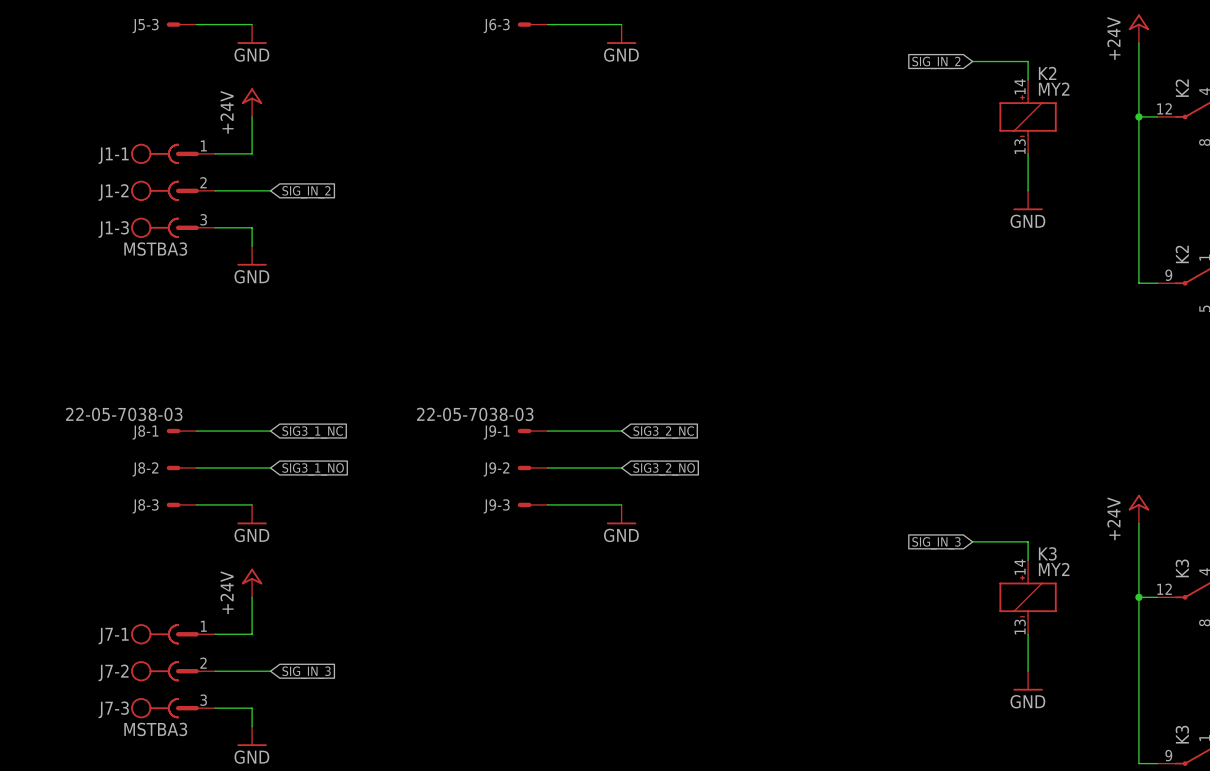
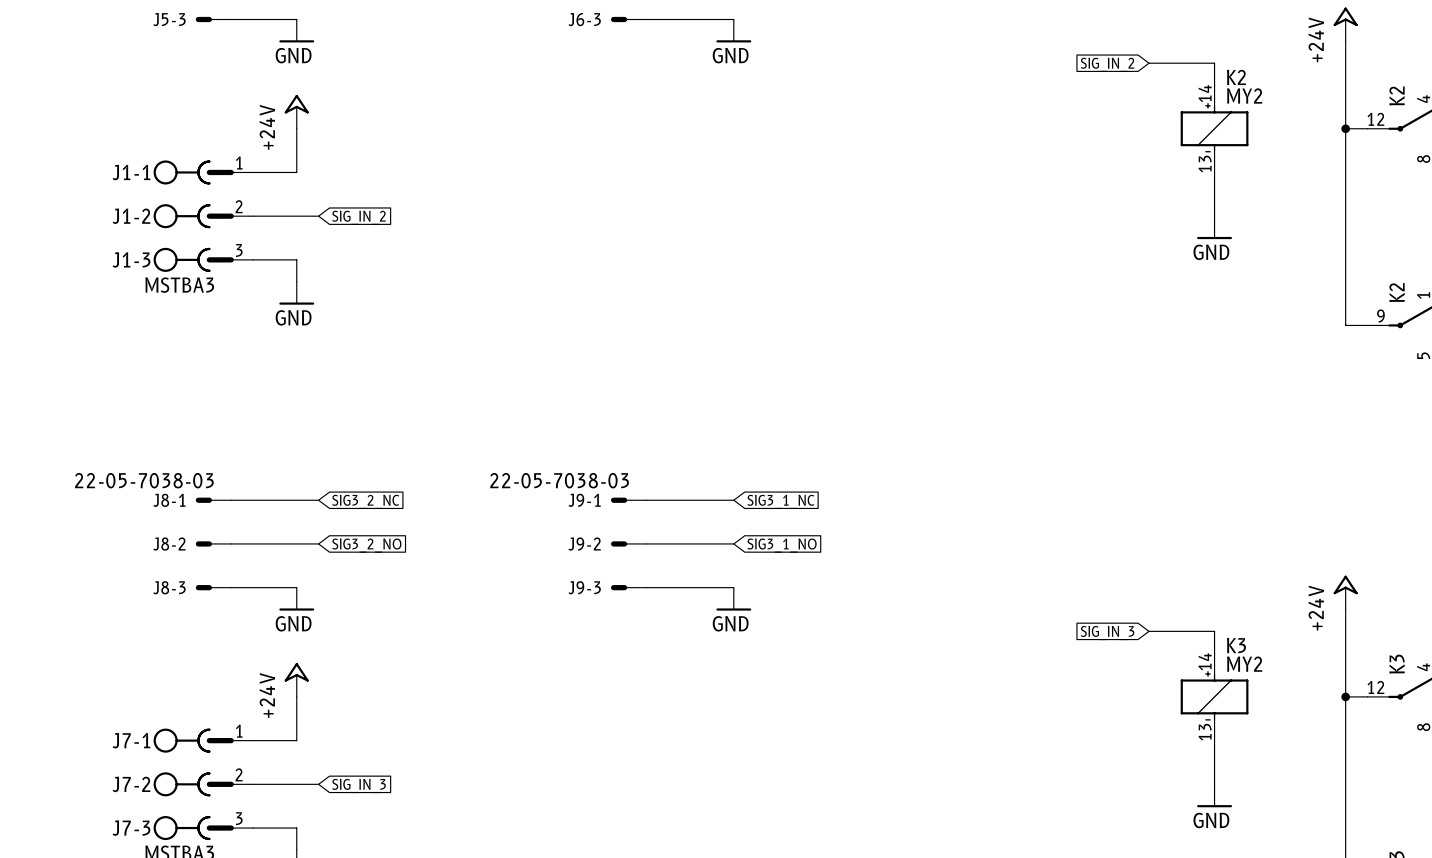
global label: SIG3_1_NC (312, 432) -> SIG3_2_NC (365, 501)
global label: SIG3_2_NC (663, 432) -> SIG3_1_NC (780, 501)
global label: SIG3_1_NO (313, 469) -> SIG3_2_NO (366, 545)
global label: SIG3_2_NO (664, 469) -> SIG3_1_NO (782, 545)

